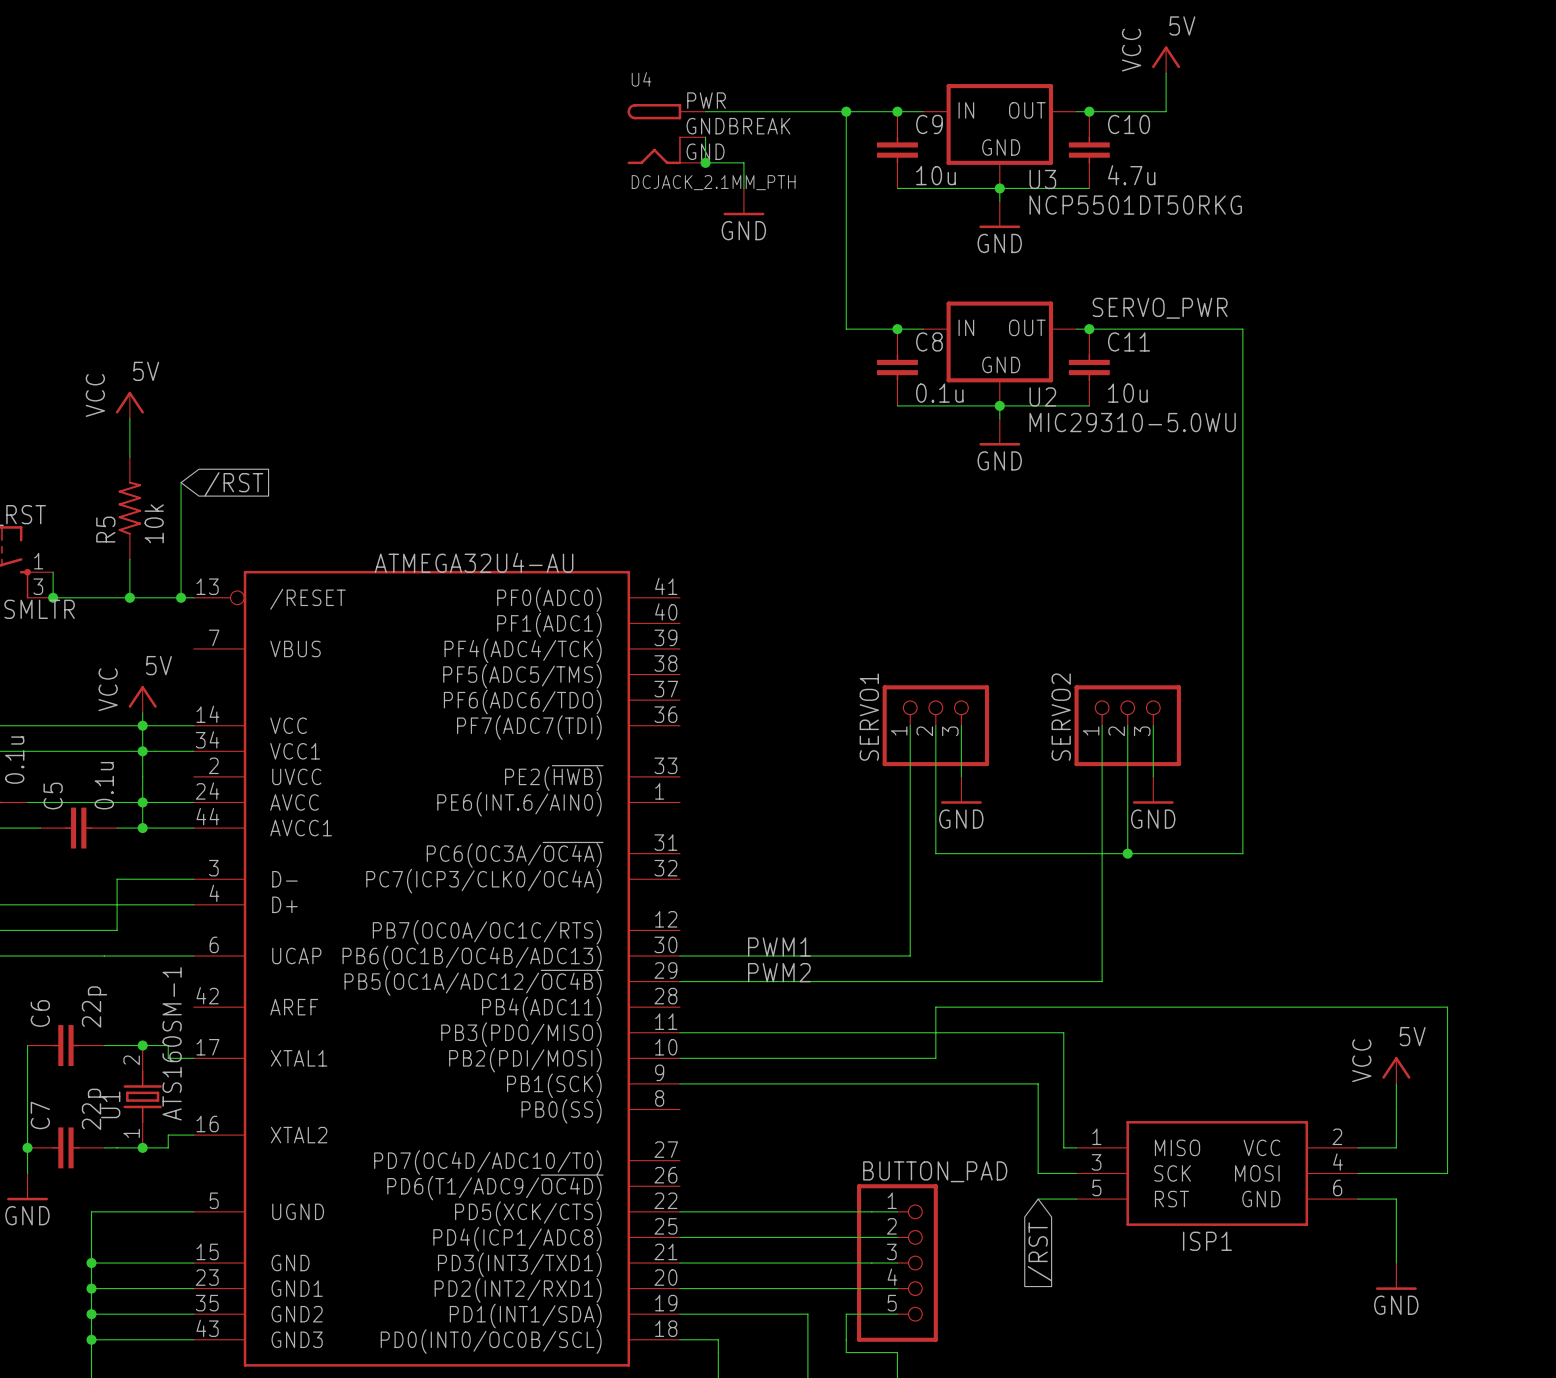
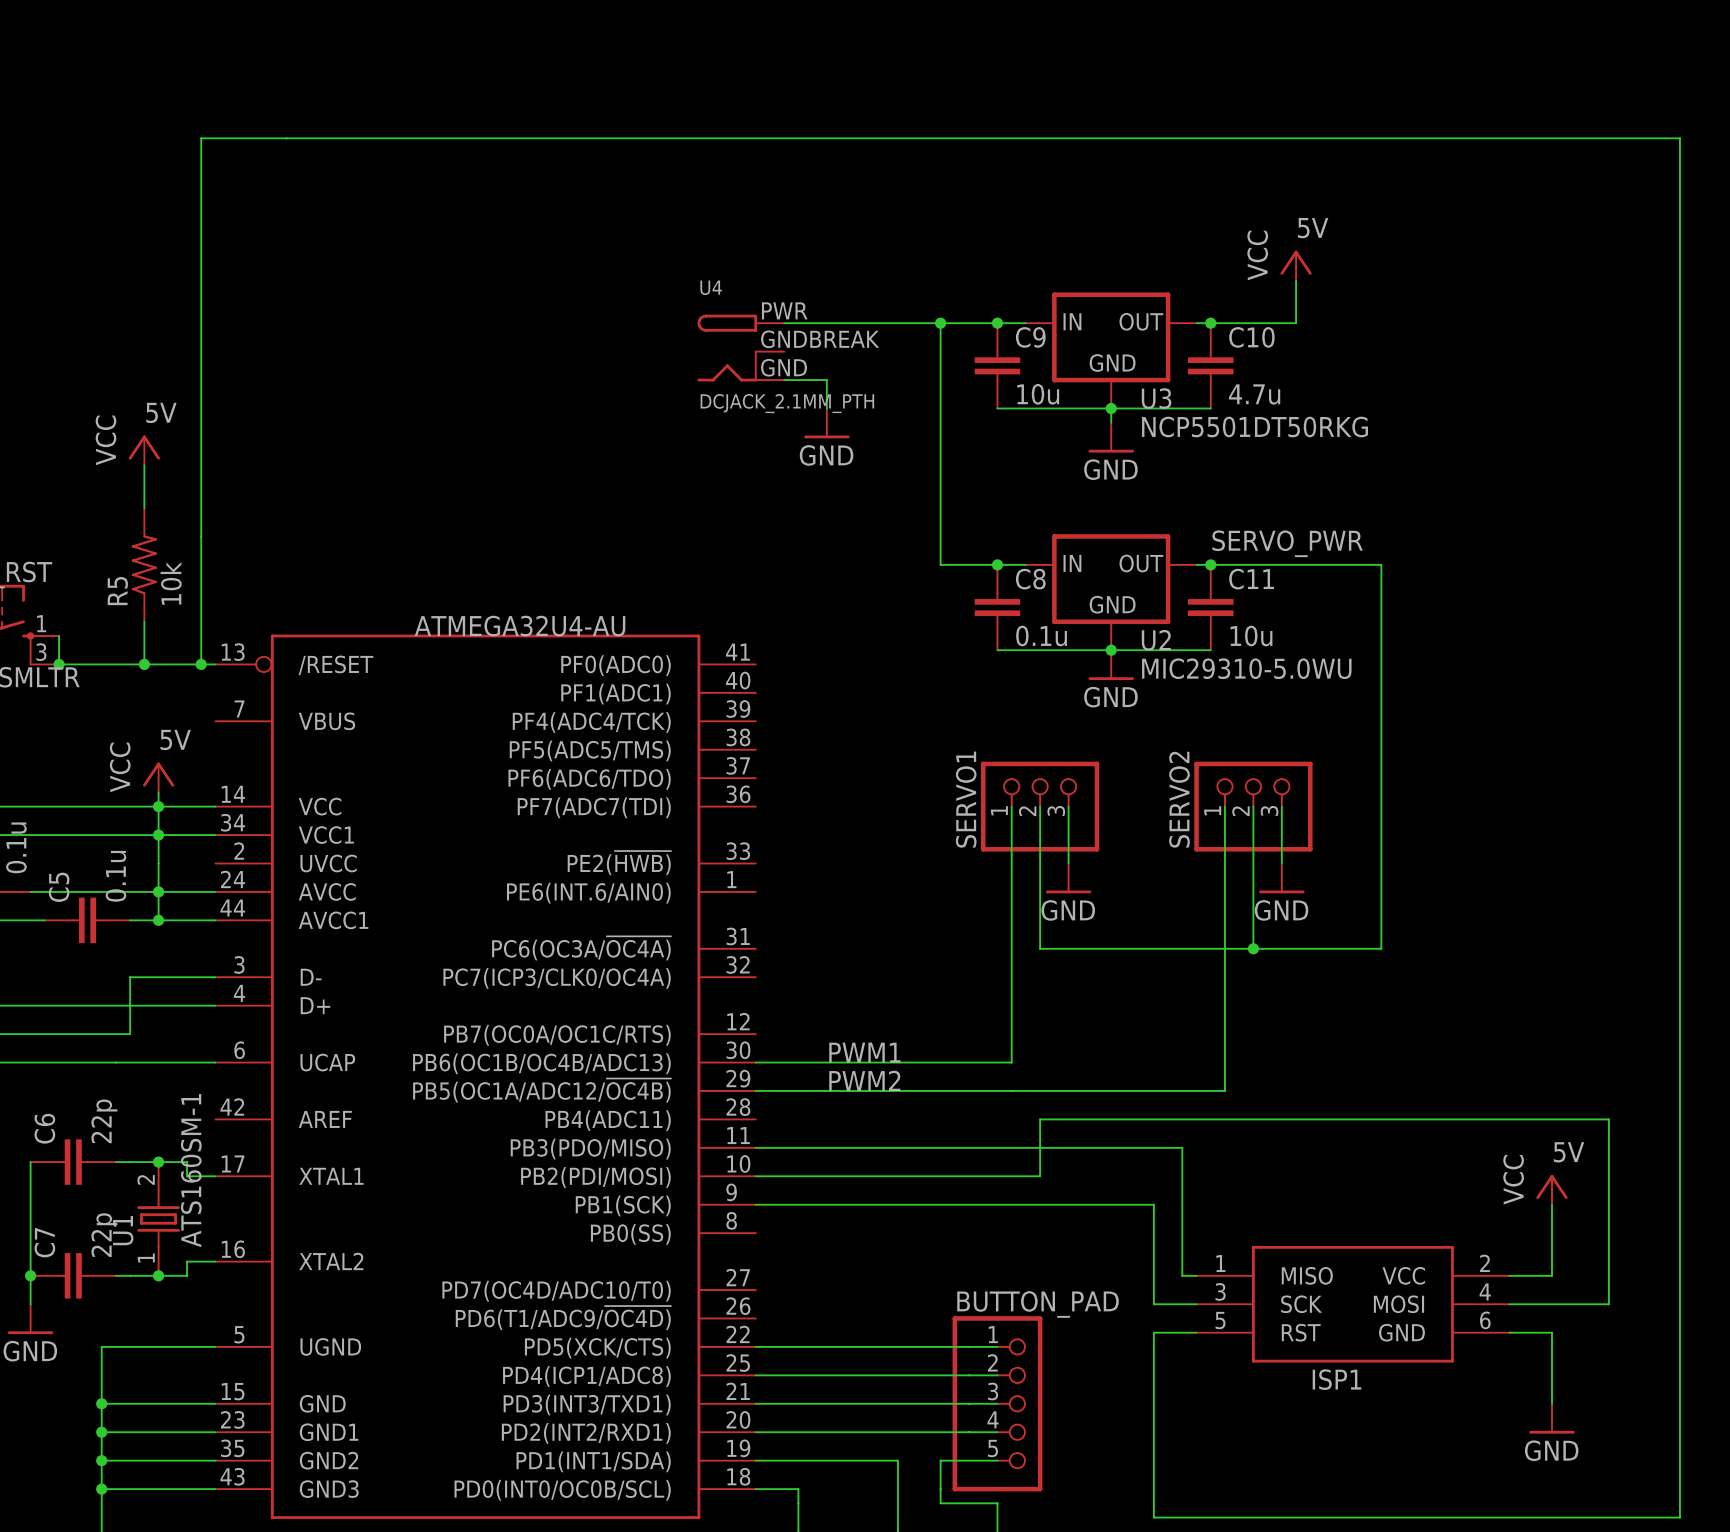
power symbol position: VCC (1166, 59) -> VCC (1296, 265)
wire: (1166, 73) (1166, 111) (1076, 111) -> (1296, 280) (1296, 323) (1196, 323)
wire: (705, 111) (923, 111) -> (784, 323) (1025, 323)
wire: (846, 111) (846, 290) -> none
junction: (846, 111) -> none
junction: (897, 111) -> none
junction: (1089, 111) -> none
U4 position: (666, 134) -> (740, 348)
U3 position: (999, 136) -> (1111, 350)
wire: (705, 137) (705, 162) (743, 162) (743, 188) -> none
C9 position: (897, 150) -> (997, 365)
C10 position: (1089, 150) -> (1210, 365)
junction: (705, 162) -> none
wire: (897, 188) (1089, 188) -> (997, 408) (1210, 408)
wire: (999, 188) (999, 201) -> (1111, 408) (1111, 422)
junction: (999, 188) -> none
power symbol: GND (743, 201) -> none
power symbol: GND (999, 214) -> none
junction: none -> (940, 323)
junction: none -> (997, 323)
label position: SERVO_PWR (1160, 308) -> SERVO_PWR (1287, 543)
wire: (846, 329) (923, 329) -> (940, 365) (940, 564) (1025, 564)
junction: (897, 329) -> none
wire: (1076, 329) (1242, 329) (1242, 508) -> (1196, 564) (1381, 564)
junction position: (1089, 329) -> (1210, 323)
wire: none -> (784, 380) (826, 380) (826, 408)
U2 position: (999, 353) -> (1111, 592)
C8 position: (897, 367) -> (997, 607)
C11 position: (1089, 367) -> (1210, 607)
power symbol: none -> GND (826, 423)
wire: (897, 405) (1089, 405) -> (997, 650) (1210, 650)
wire: (999, 405) (999, 418) -> none
junction position: (999, 405) -> (1111, 408)
power symbol position: GND (999, 432) -> GND (1111, 437)
wire: none -> (201, 536) (201, 138) (1679, 138) (1679, 1517) (1153, 1517) (1153, 1332)
global label: /RST (233, 484) -> none
junction: none -> (997, 564)
junction: none -> (1210, 564)
junction: none -> (1111, 650)
power symbol: none -> GND (1111, 665)
global label: /RST (1039, 1251) -> none

